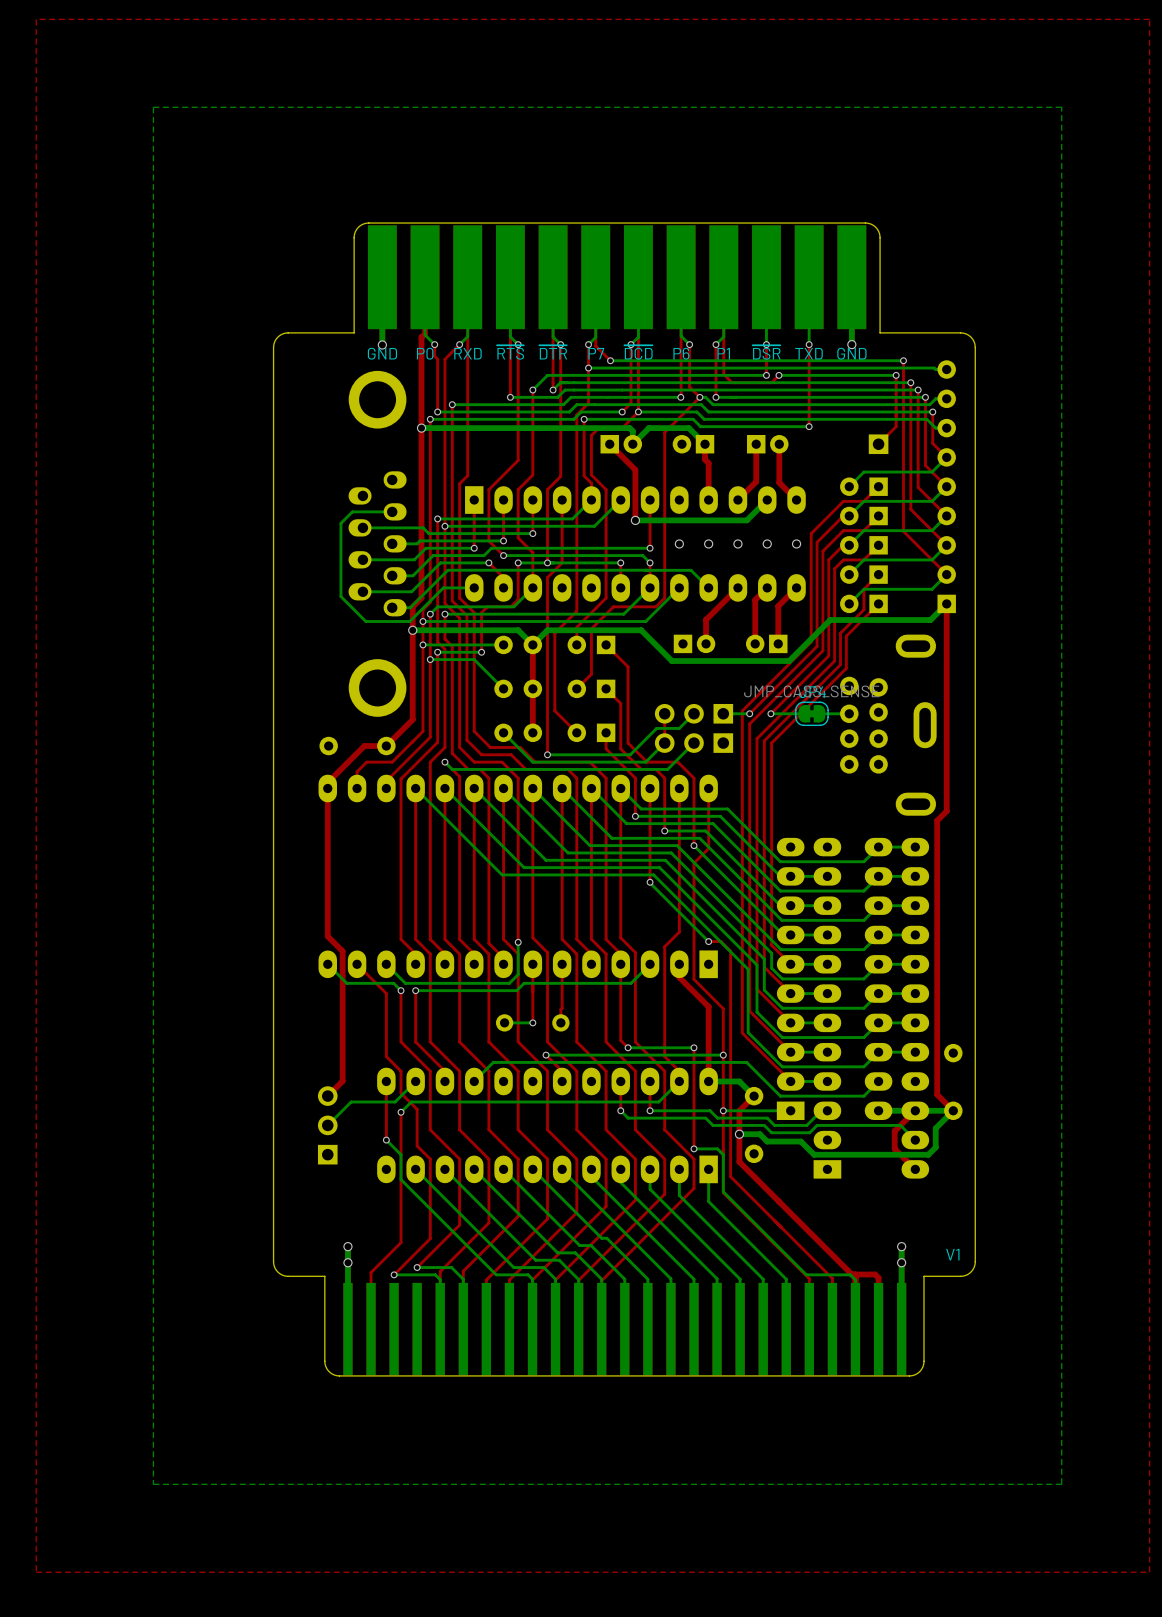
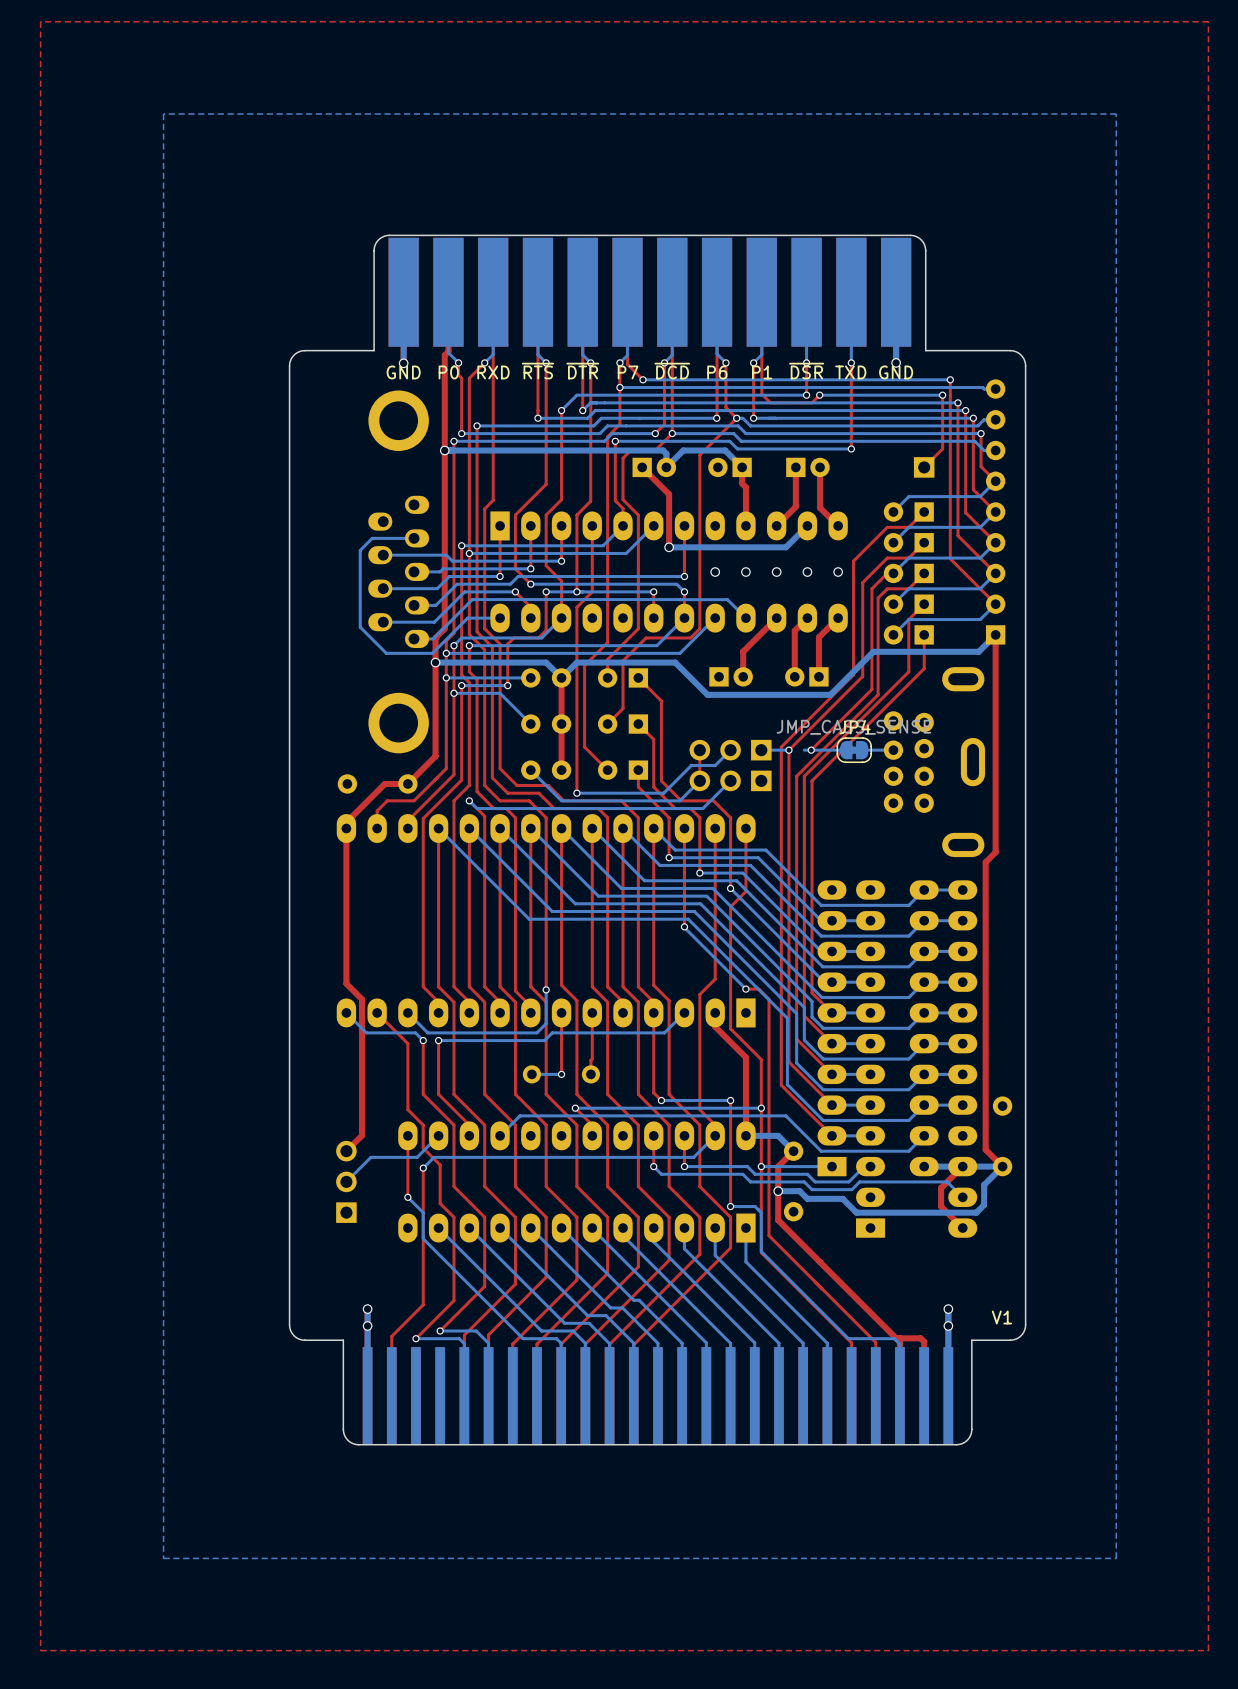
top track: (849, 516) (843, 516) (817, 542) (817, 646) -> (865, 579) (862, 582) (862, 676) (859, 679)
top track: (822, 551) (822, 650) (749, 724) -> (788, 750) (788, 760)
top track: (878, 603) (846, 636) (846, 668) -> (924, 634) (924, 668) (890, 702)
top track: (863, 609) (840, 633) (840, 664) (764, 740) -> (908, 641) (908, 671) (804, 776) (804, 778)
bottom track: none -> (811, 750) (804, 750)

